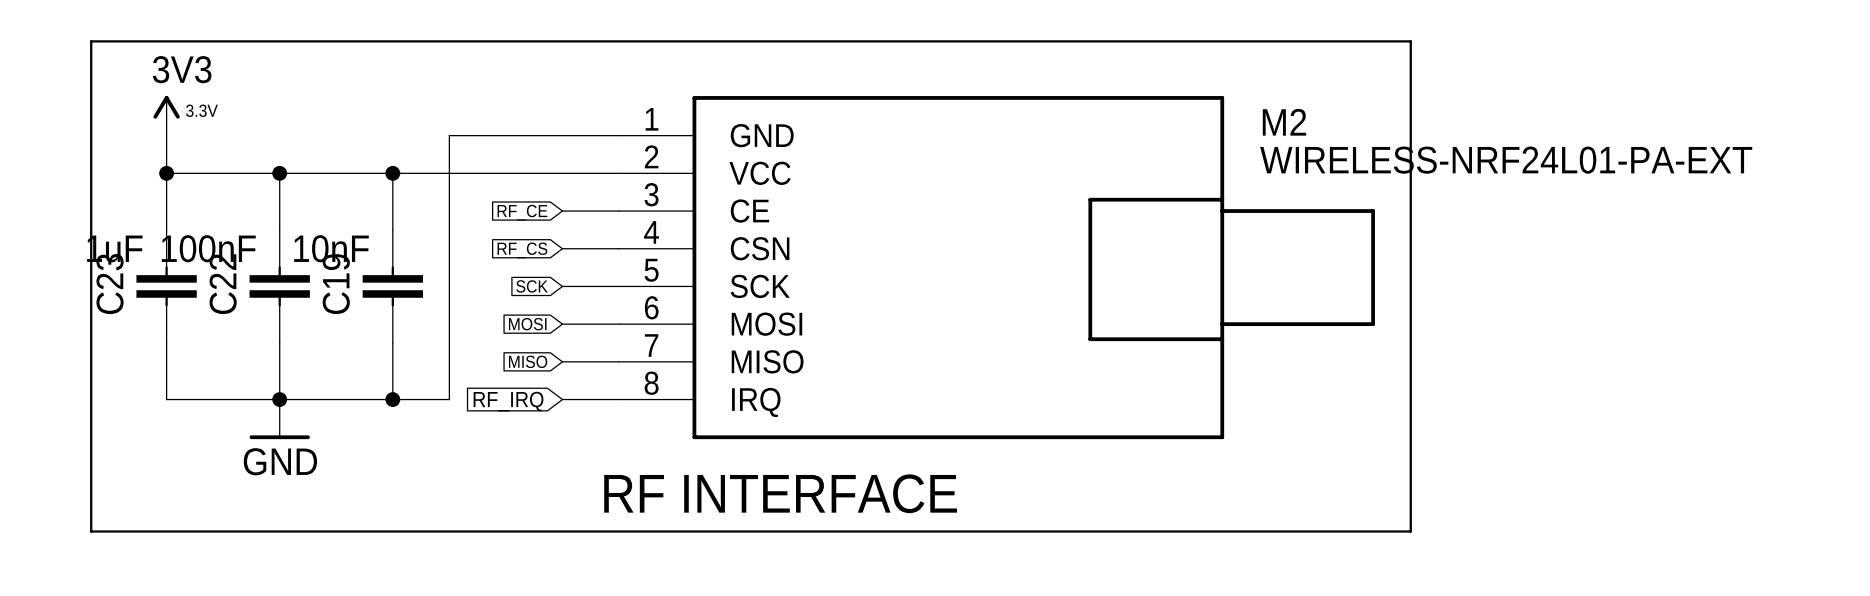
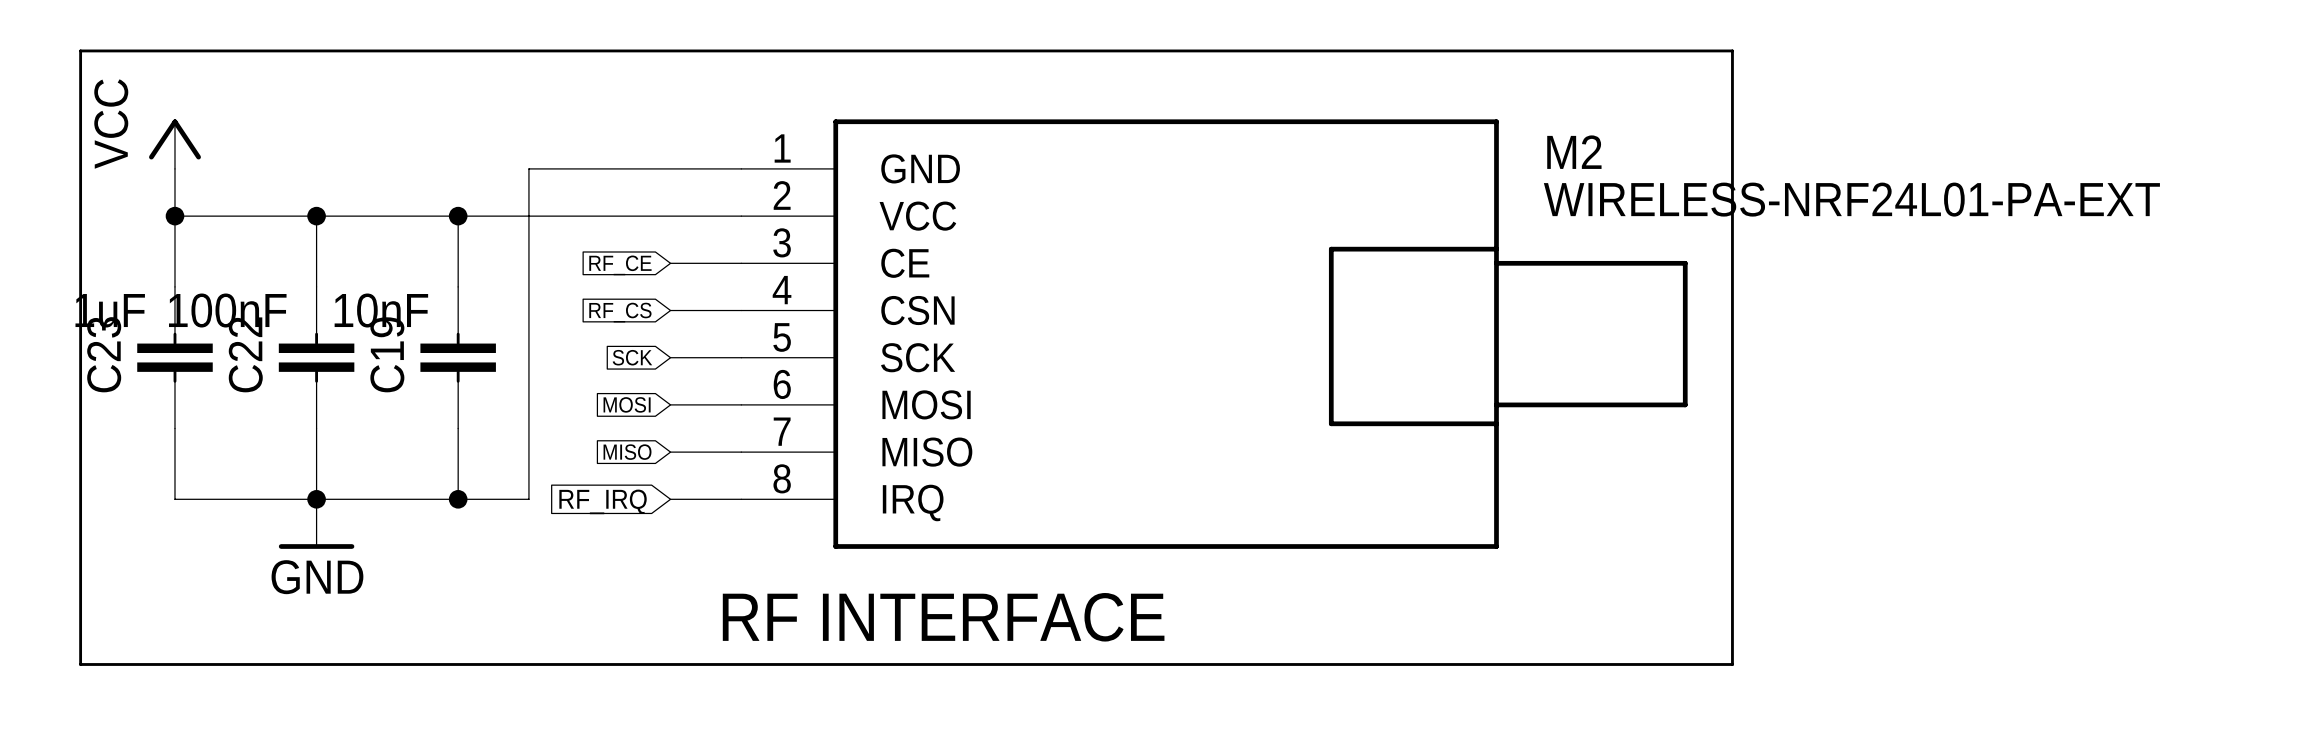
power symbol: 3V3 (166, 115) -> VCC (174, 144)

